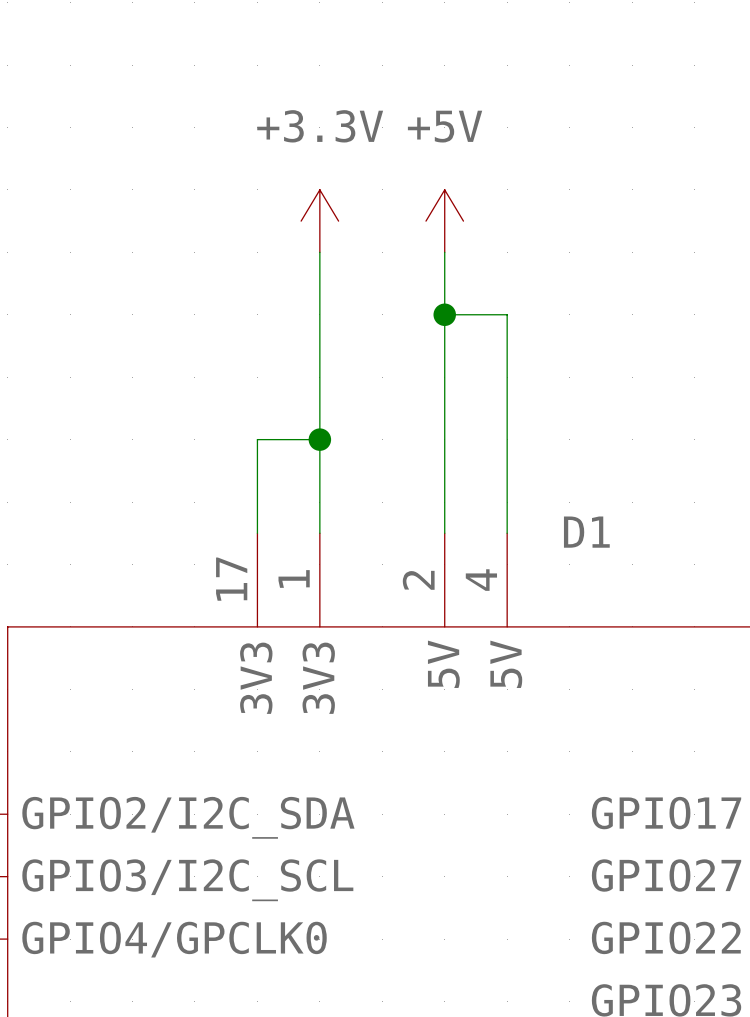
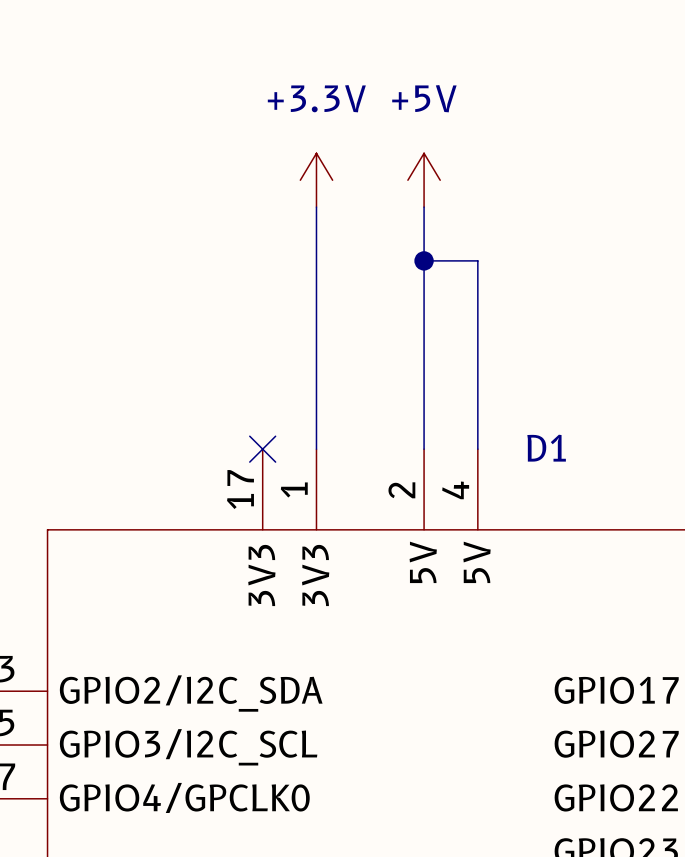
wire: (319, 439) (257, 439) (257, 533) -> none
junction: (319, 439) -> none
no-connect mark: none -> (262, 449)

